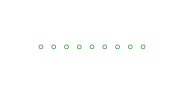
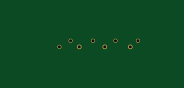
via: none -> (70, 40)
via: none -> (93, 40)
via: none -> (115, 40)
via: none -> (137, 40)
via: (40, 46) -> none
via: (53, 46) -> none
via: none -> (59, 46)
via: (66, 46) -> none
via: (92, 46) -> none
via: (117, 46) -> none
via: (143, 46) -> none

